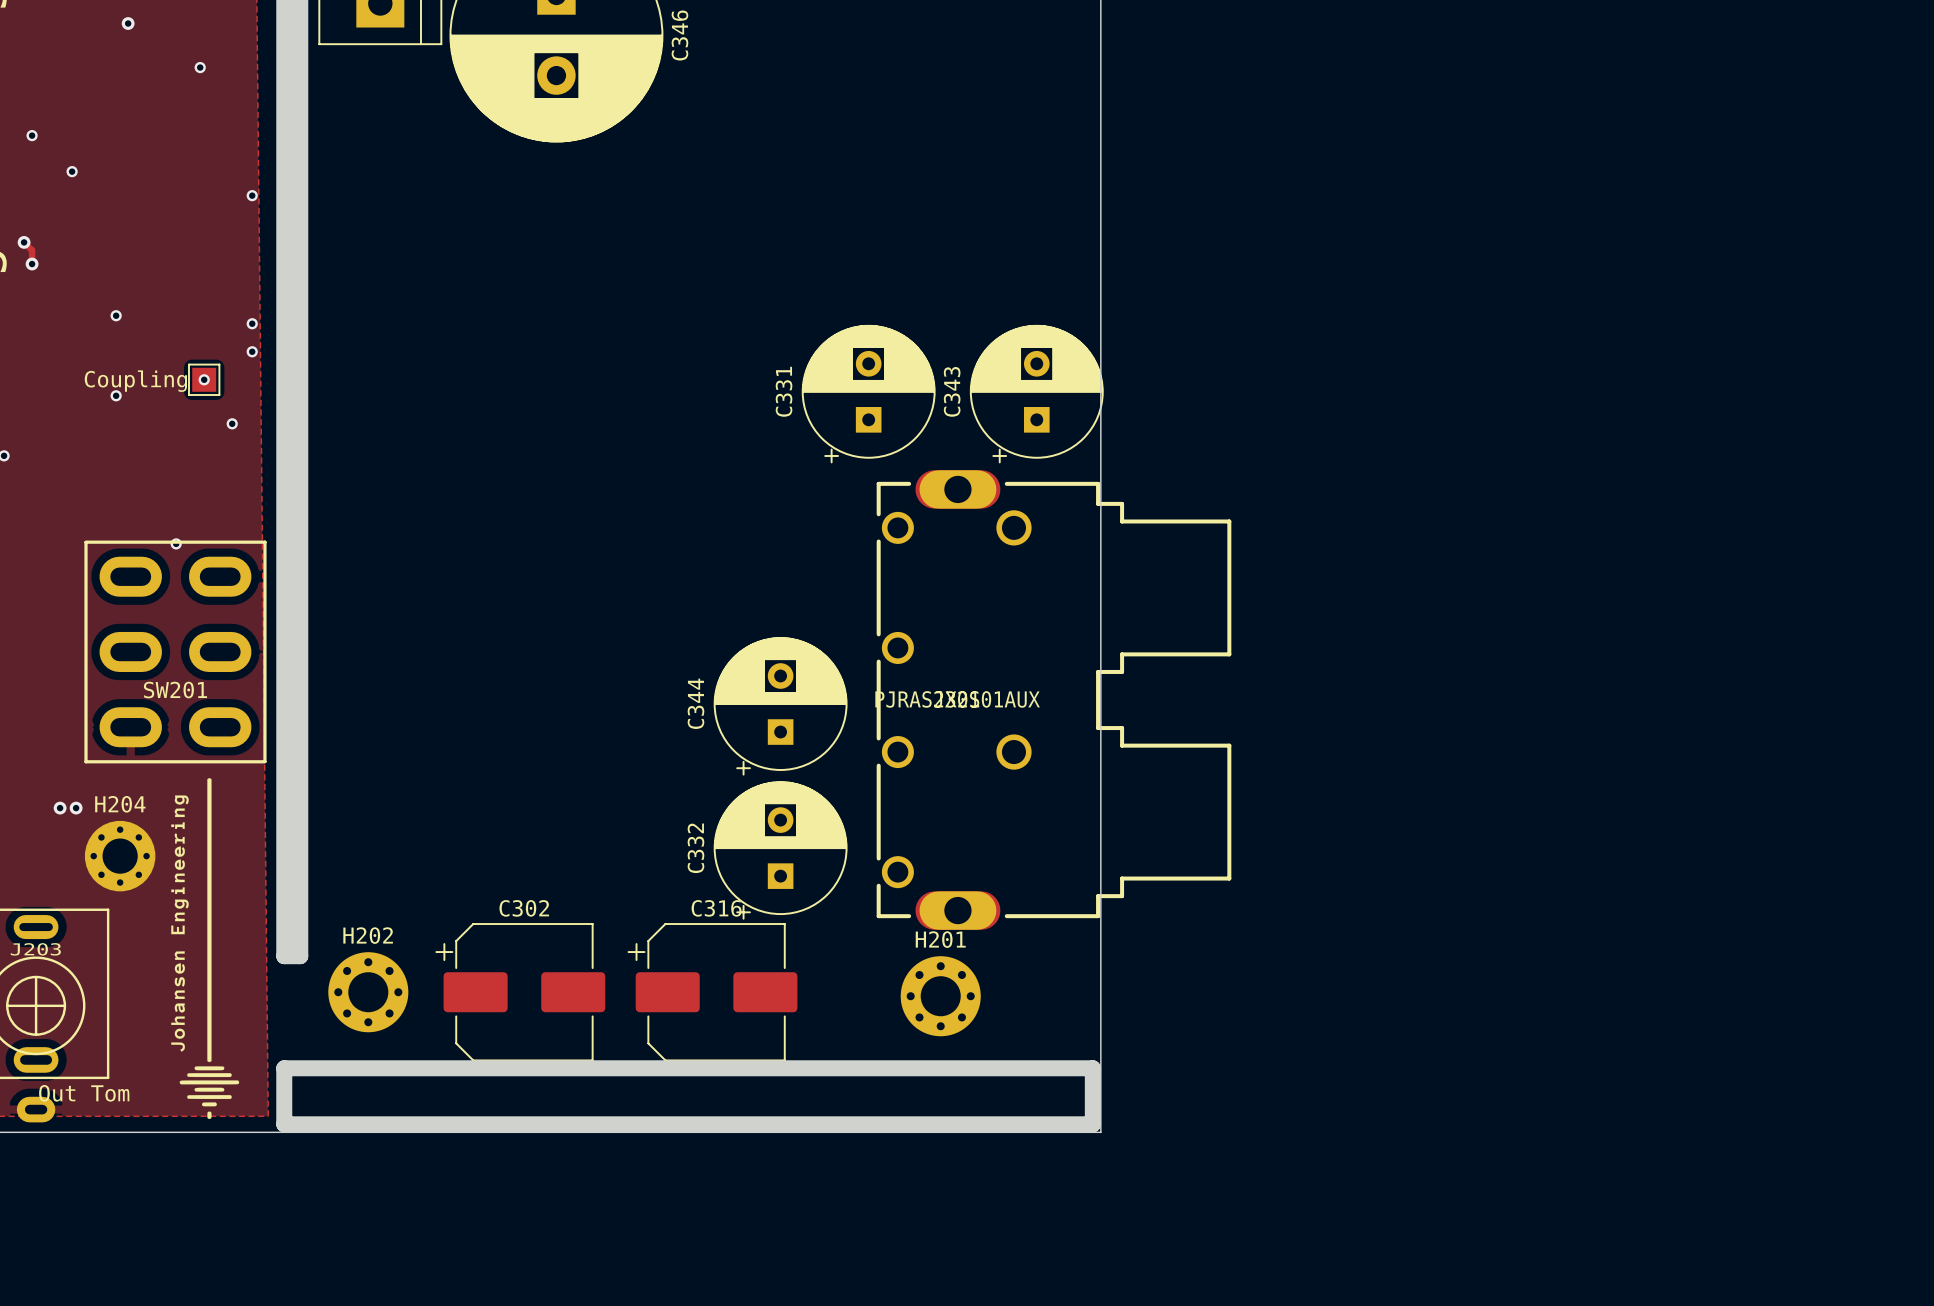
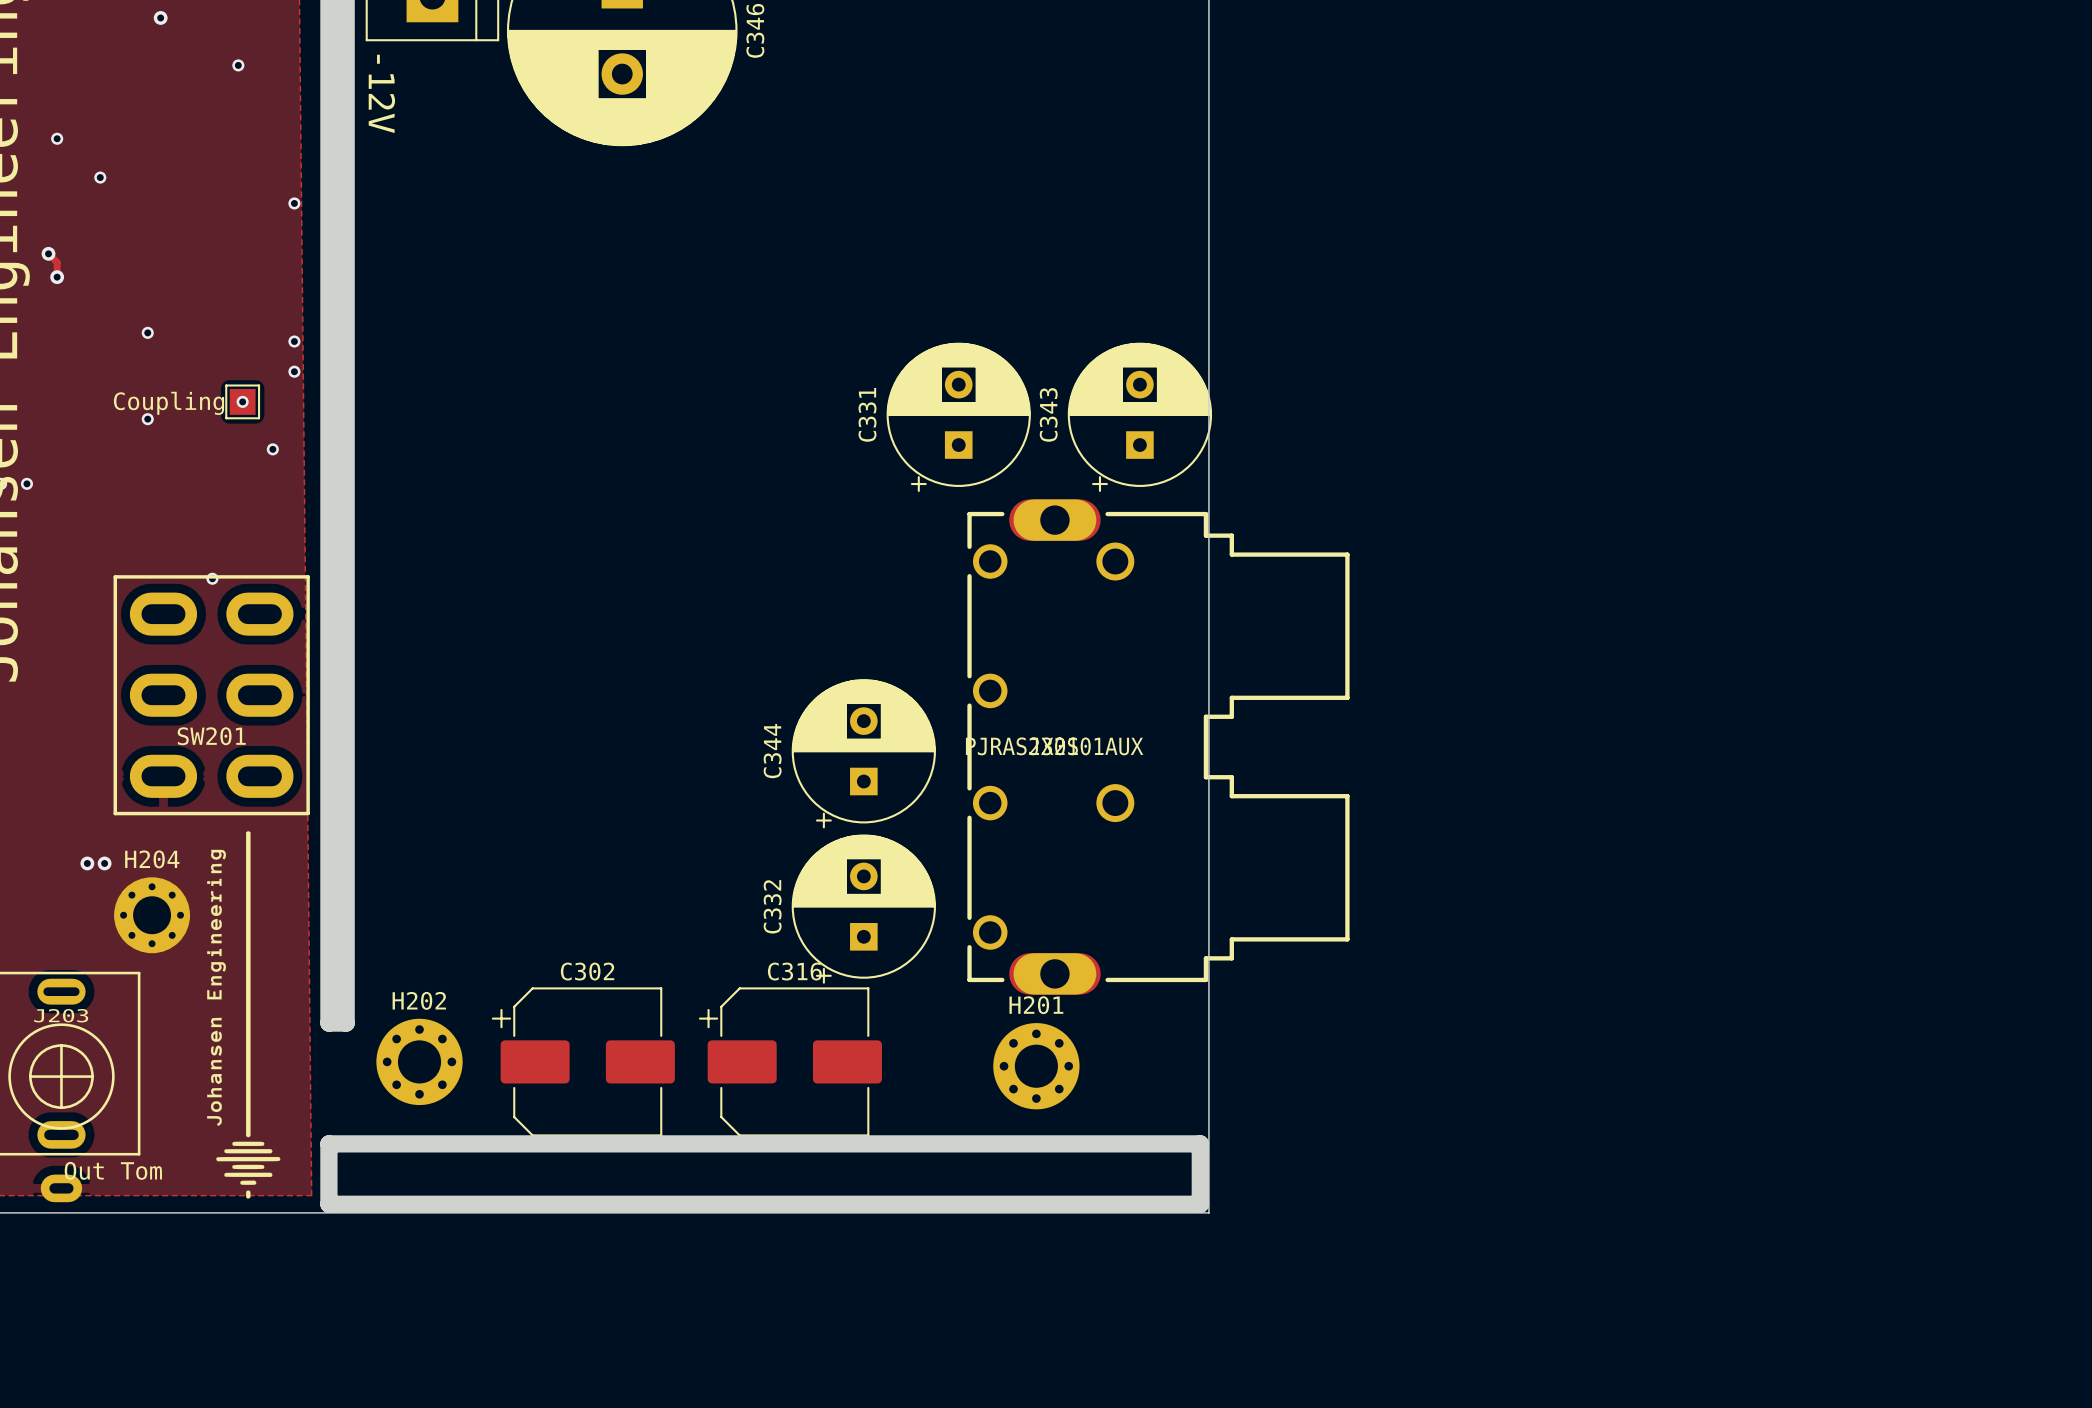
text: none -> -12V (381, 93)

